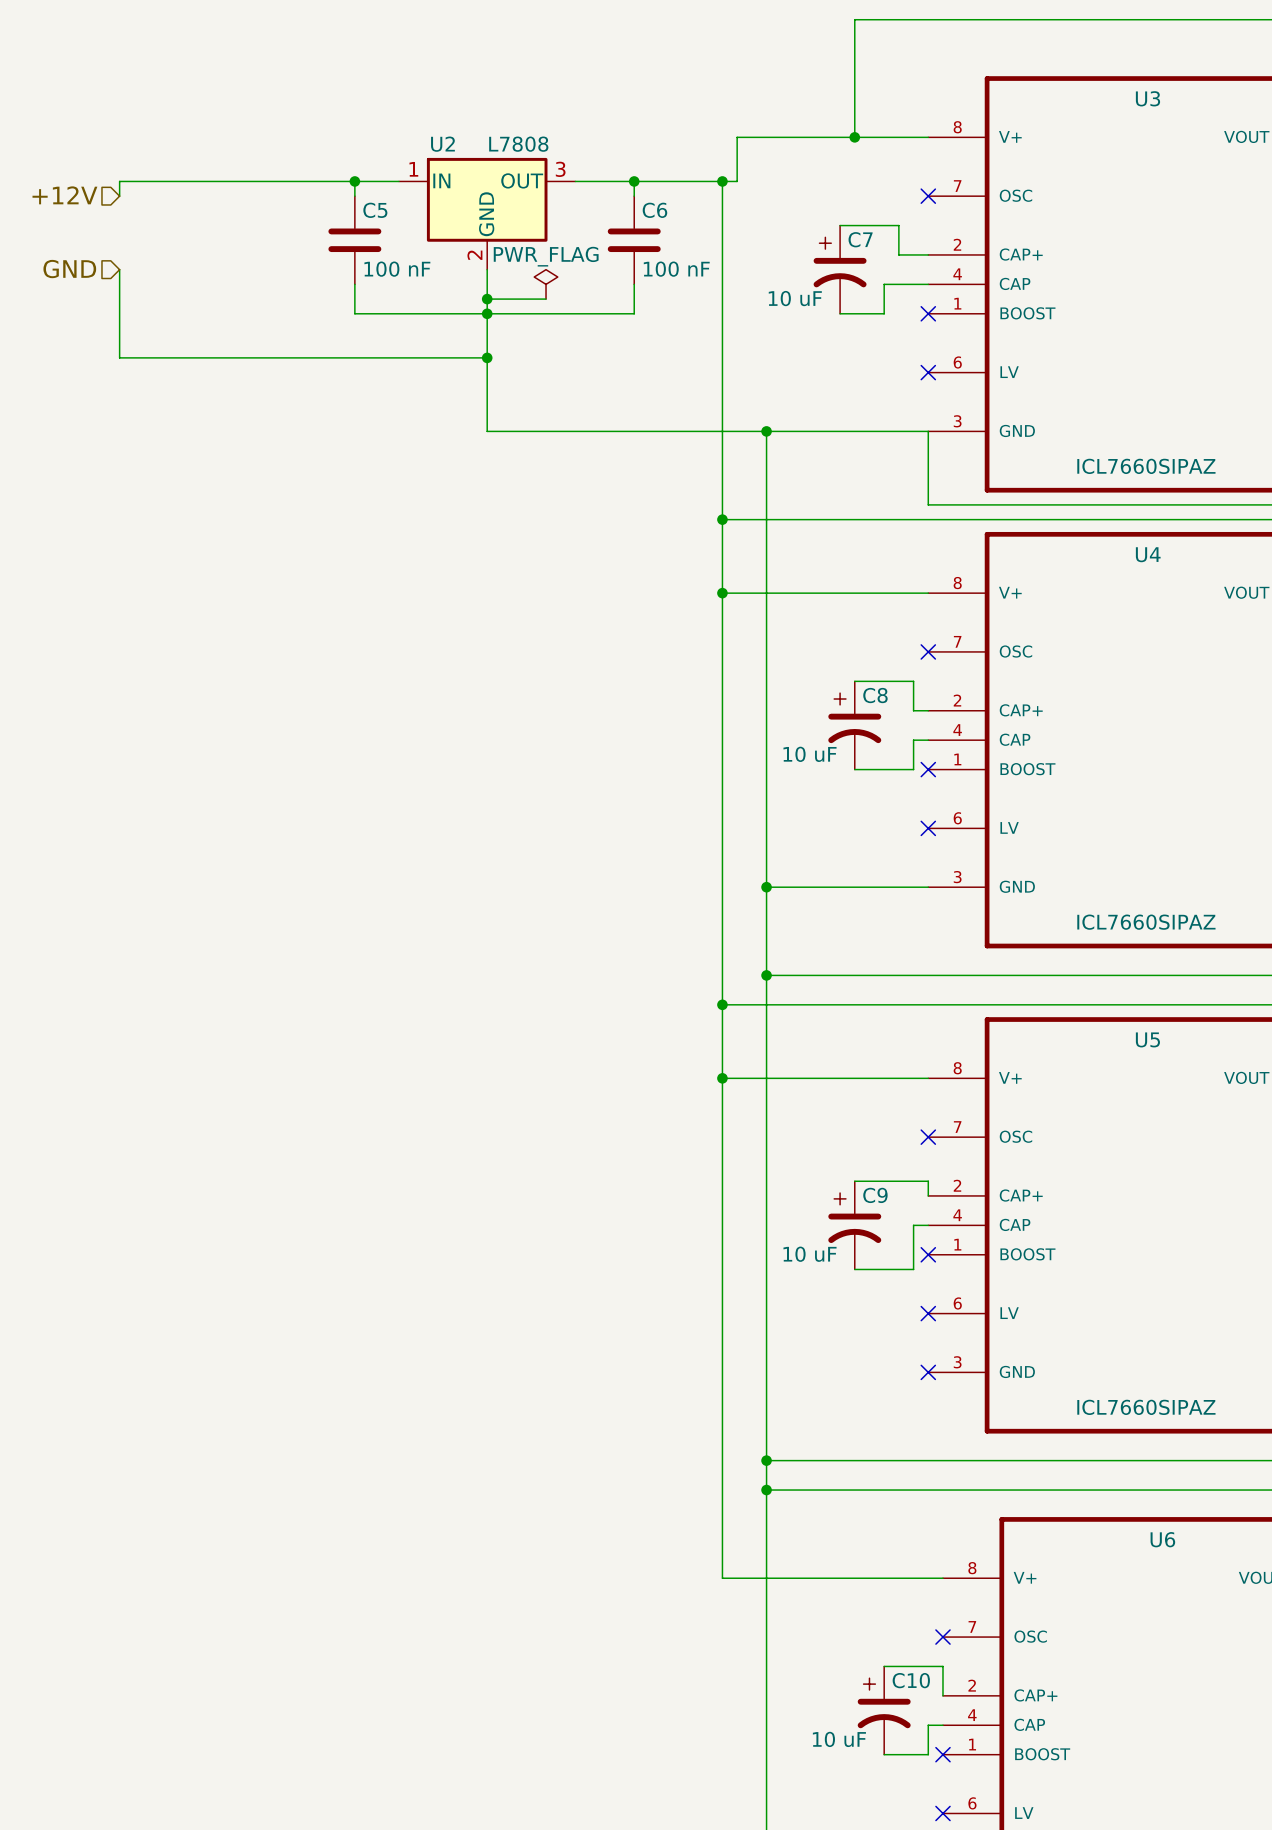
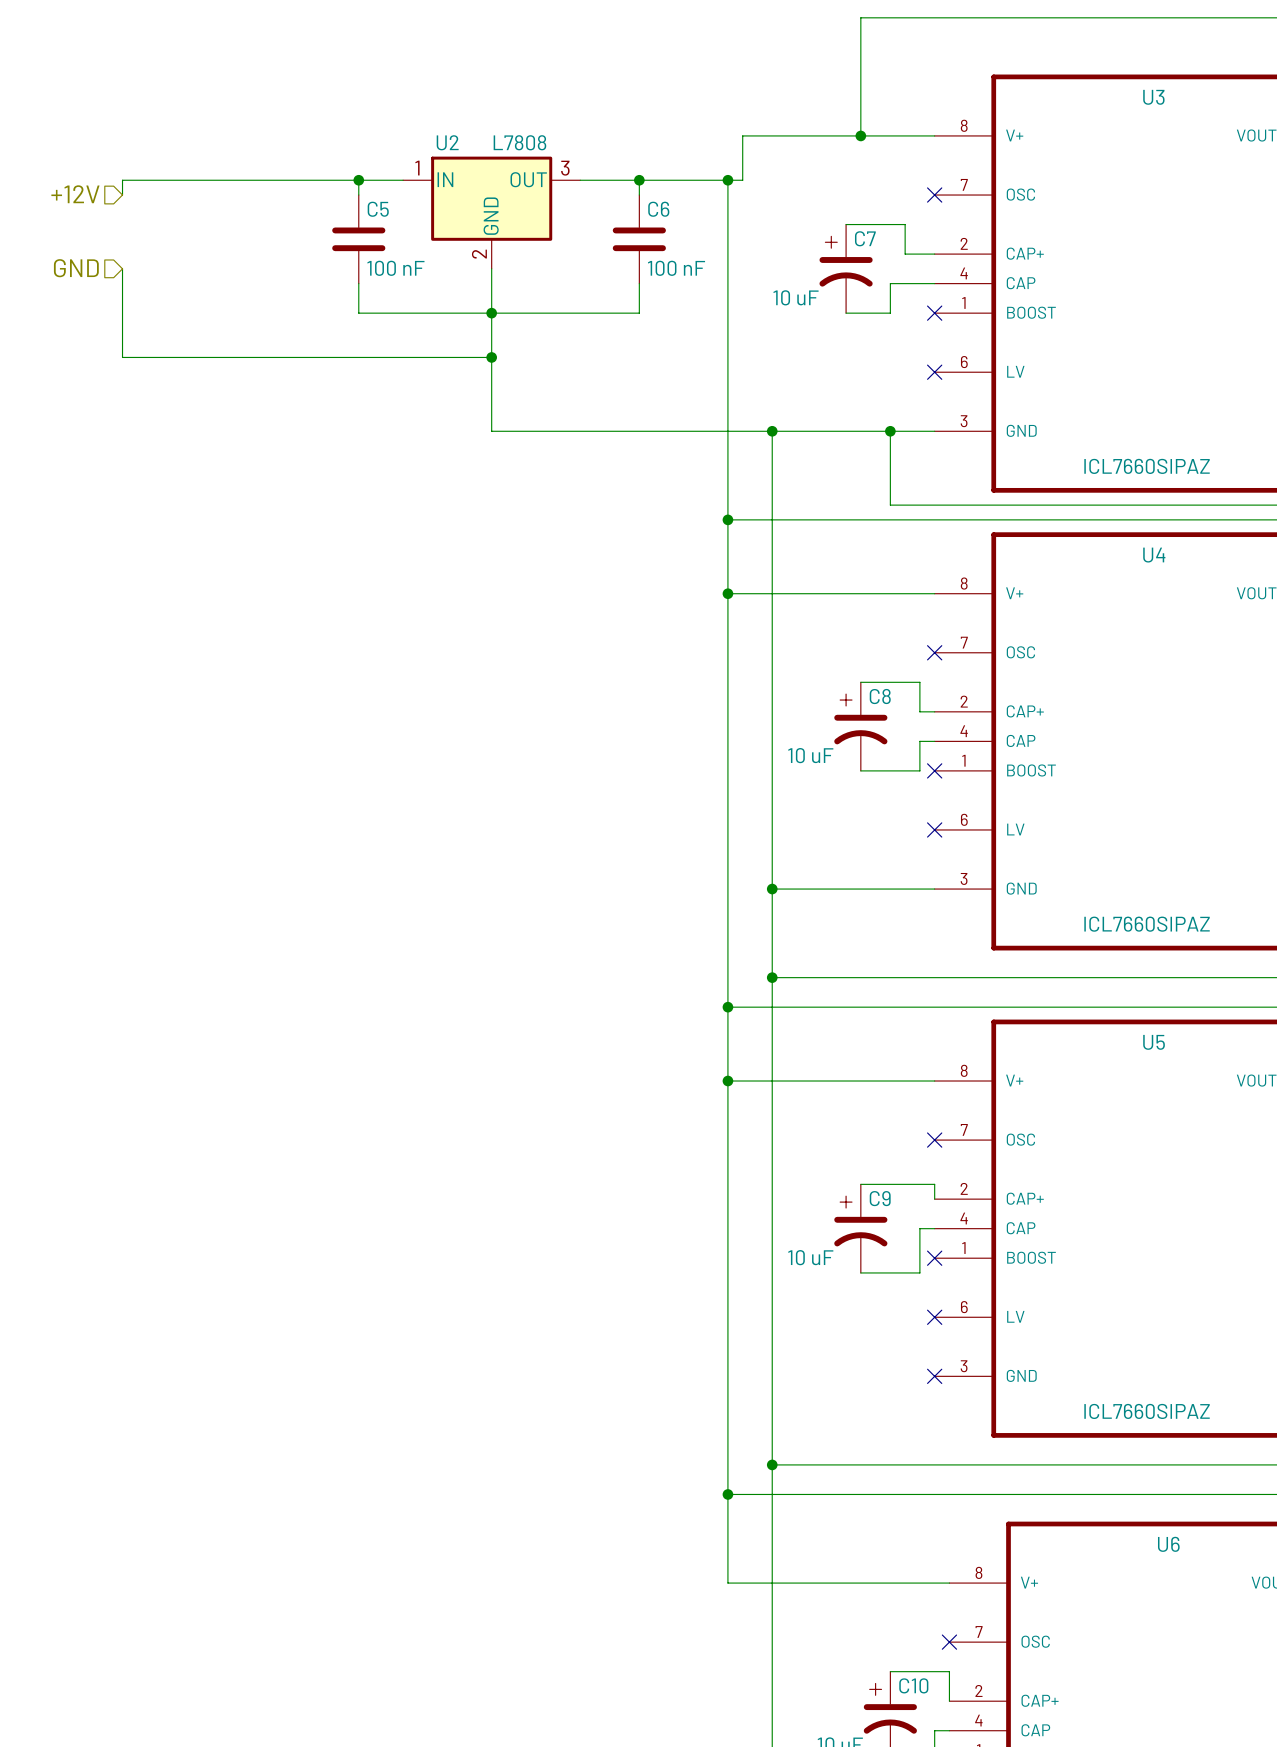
power symbol: PWR_FLAG (546, 284) -> none
wire: (487, 299) (546, 299) -> none
junction: (487, 299) -> none
junction: none -> (890, 431)
wire: (928, 431) (928, 504) -> (890, 431) (890, 505) (934, 505)
wire: none -> (727, 1494) (772, 1494)
junction position: (766, 1490) -> (727, 1494)

